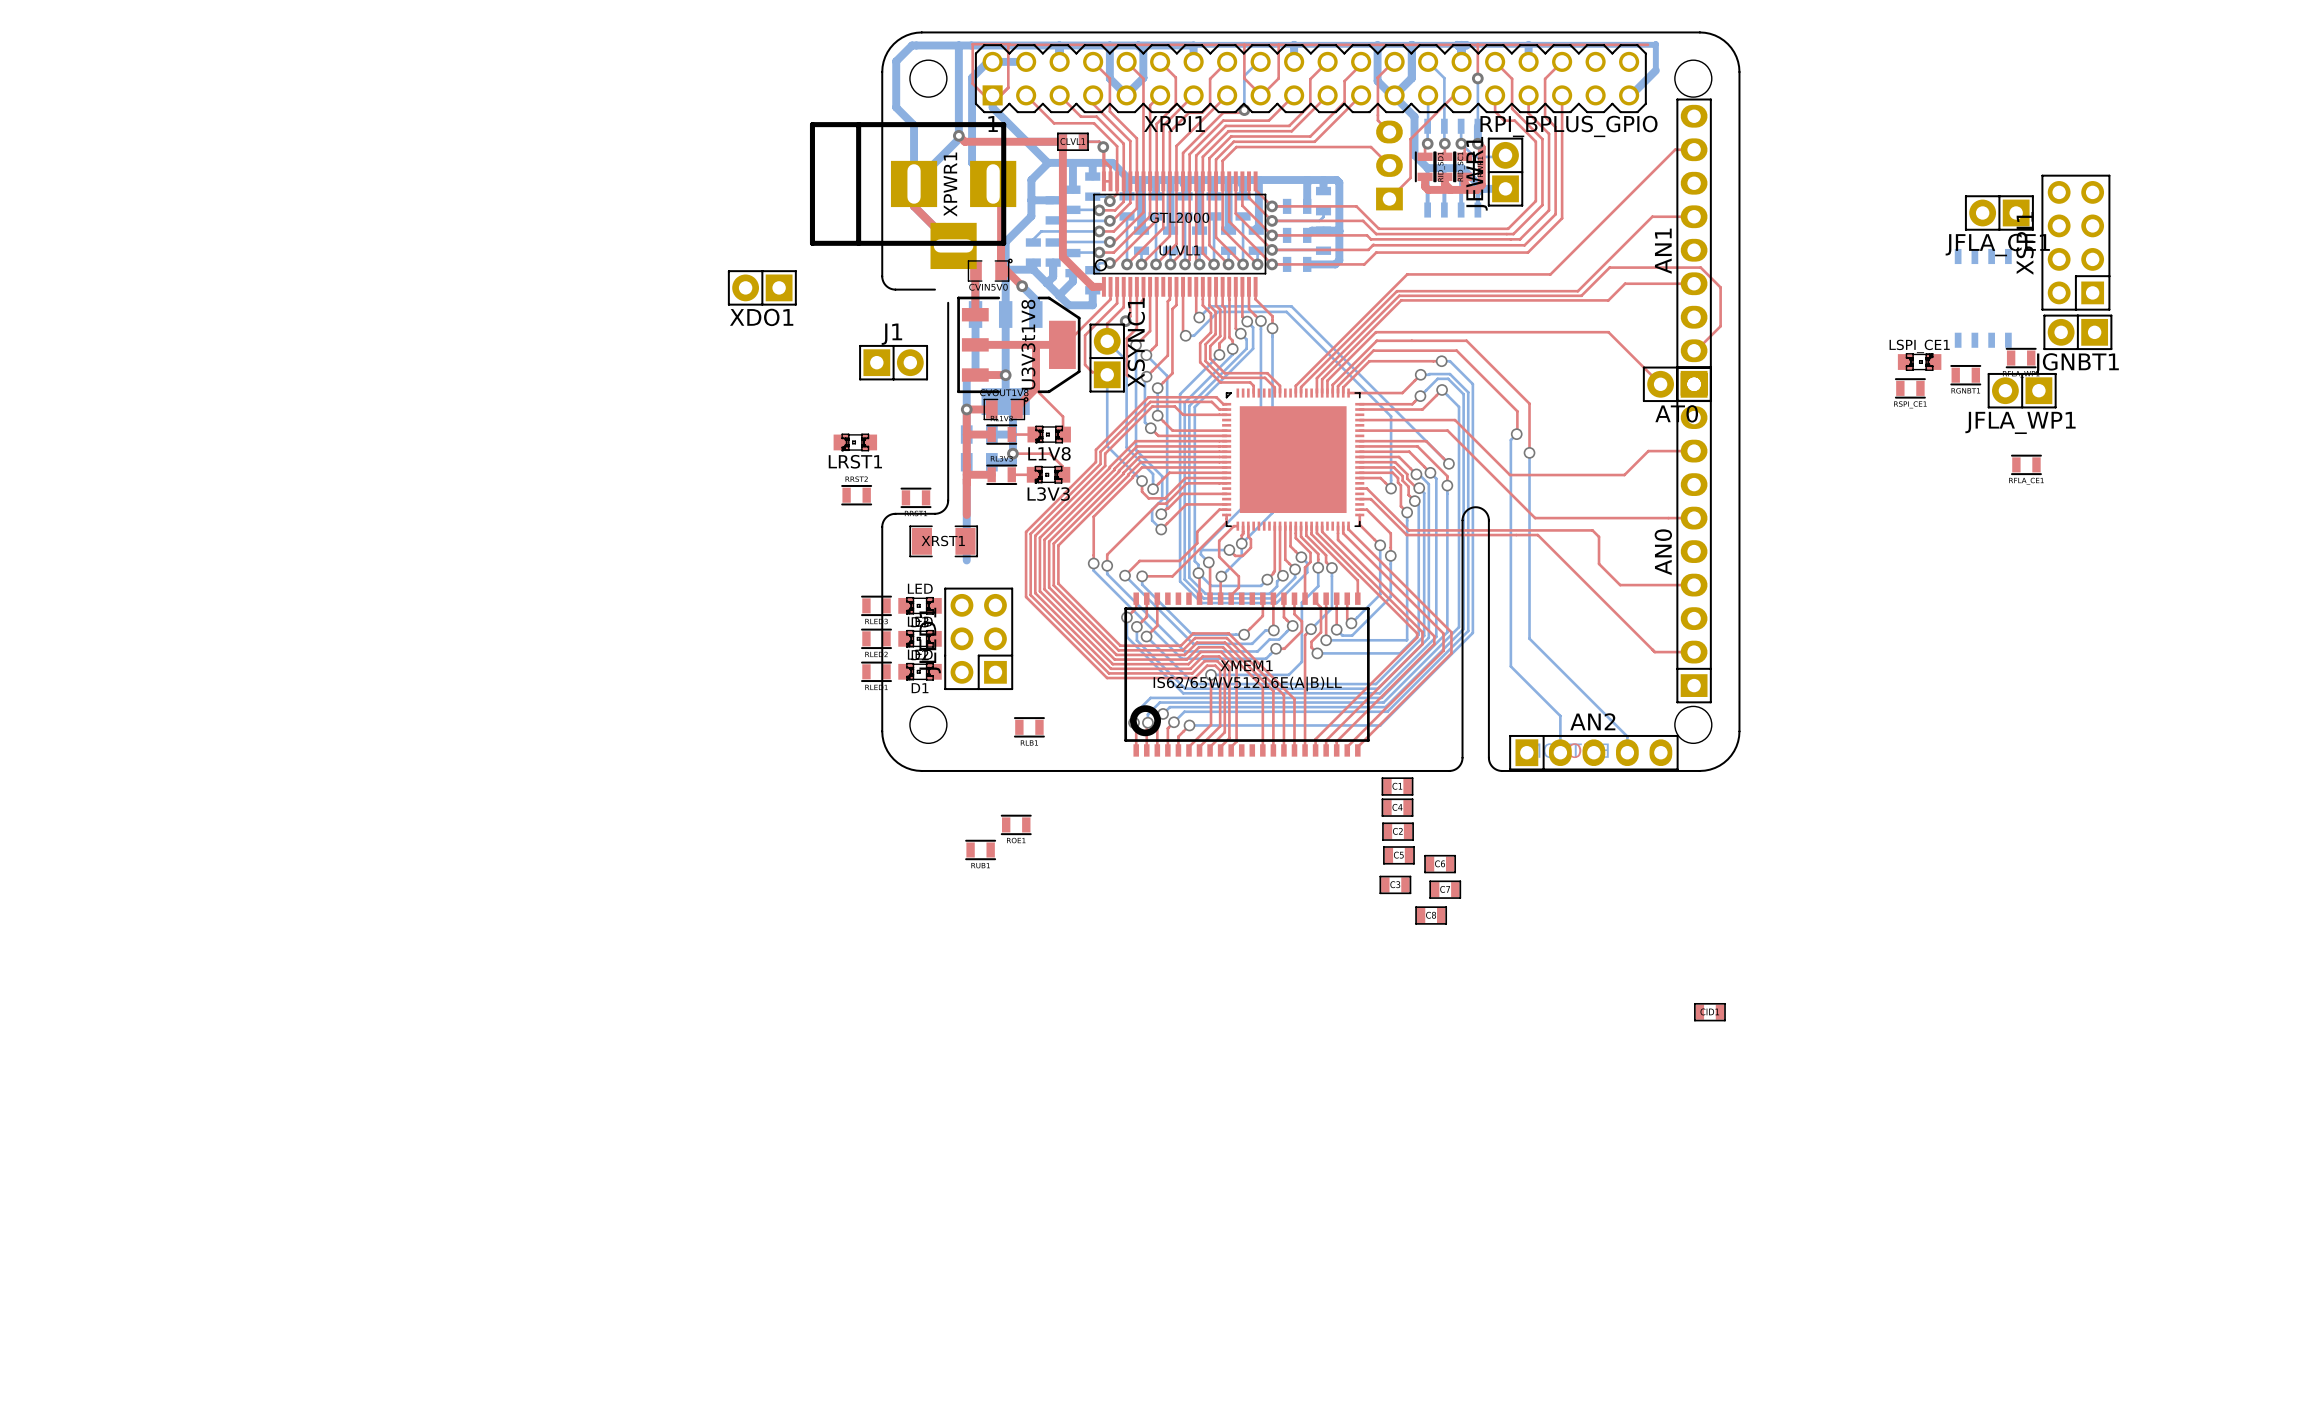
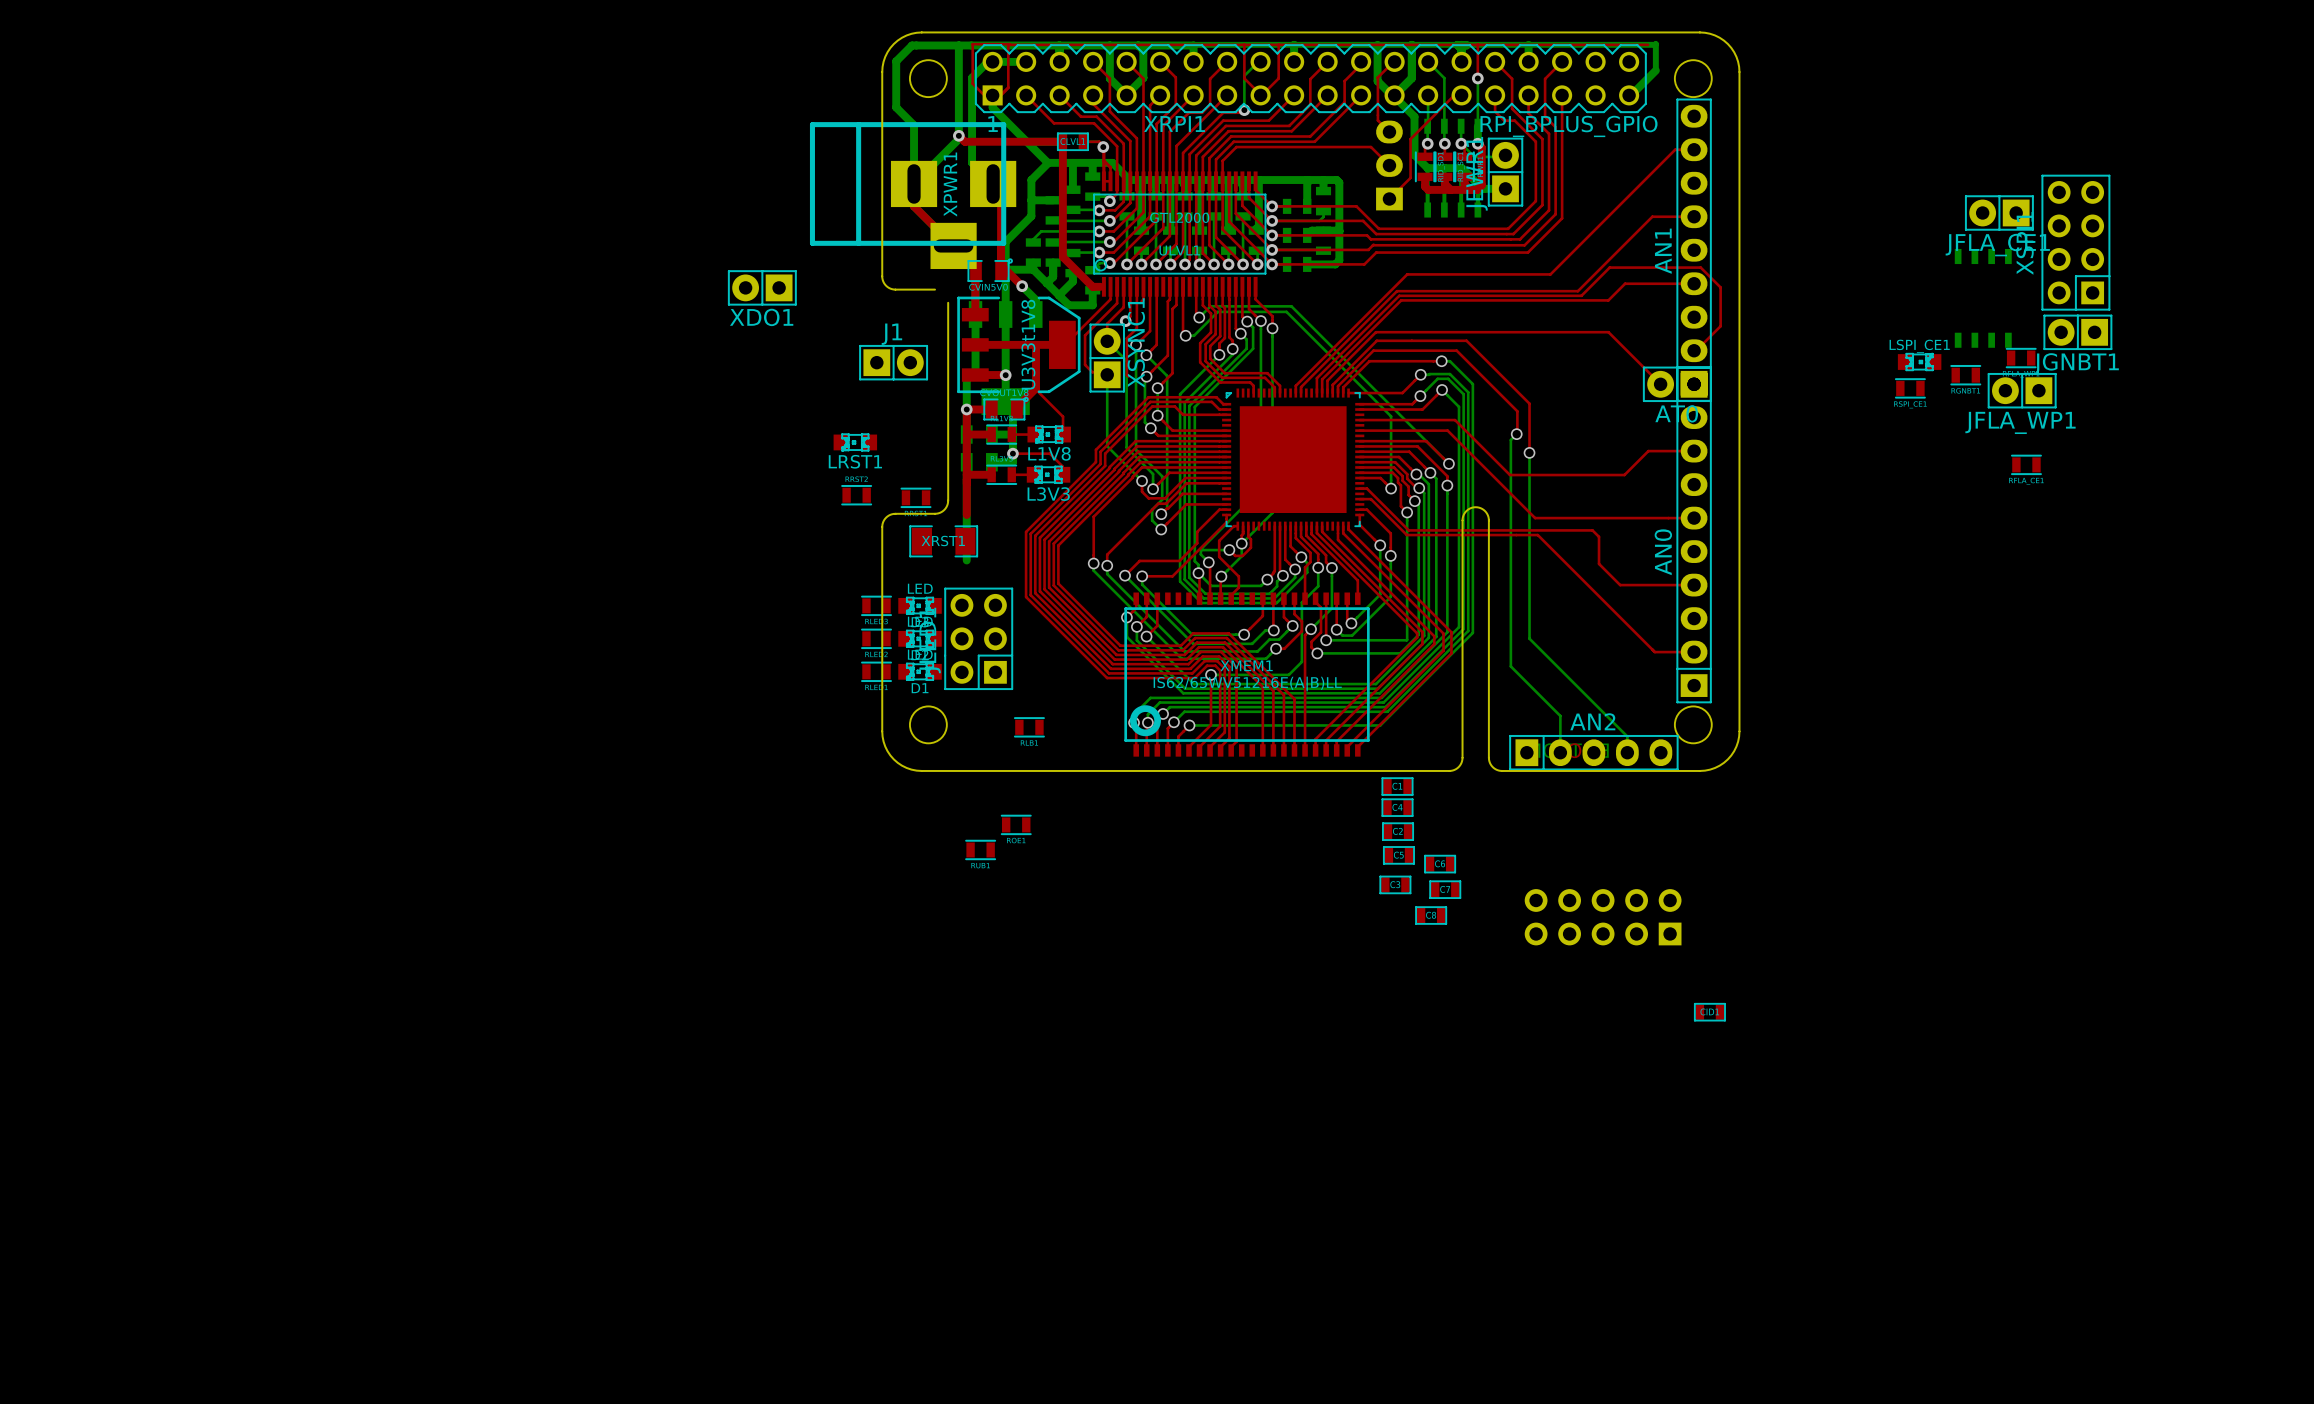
part: none -> (1603, 917)

